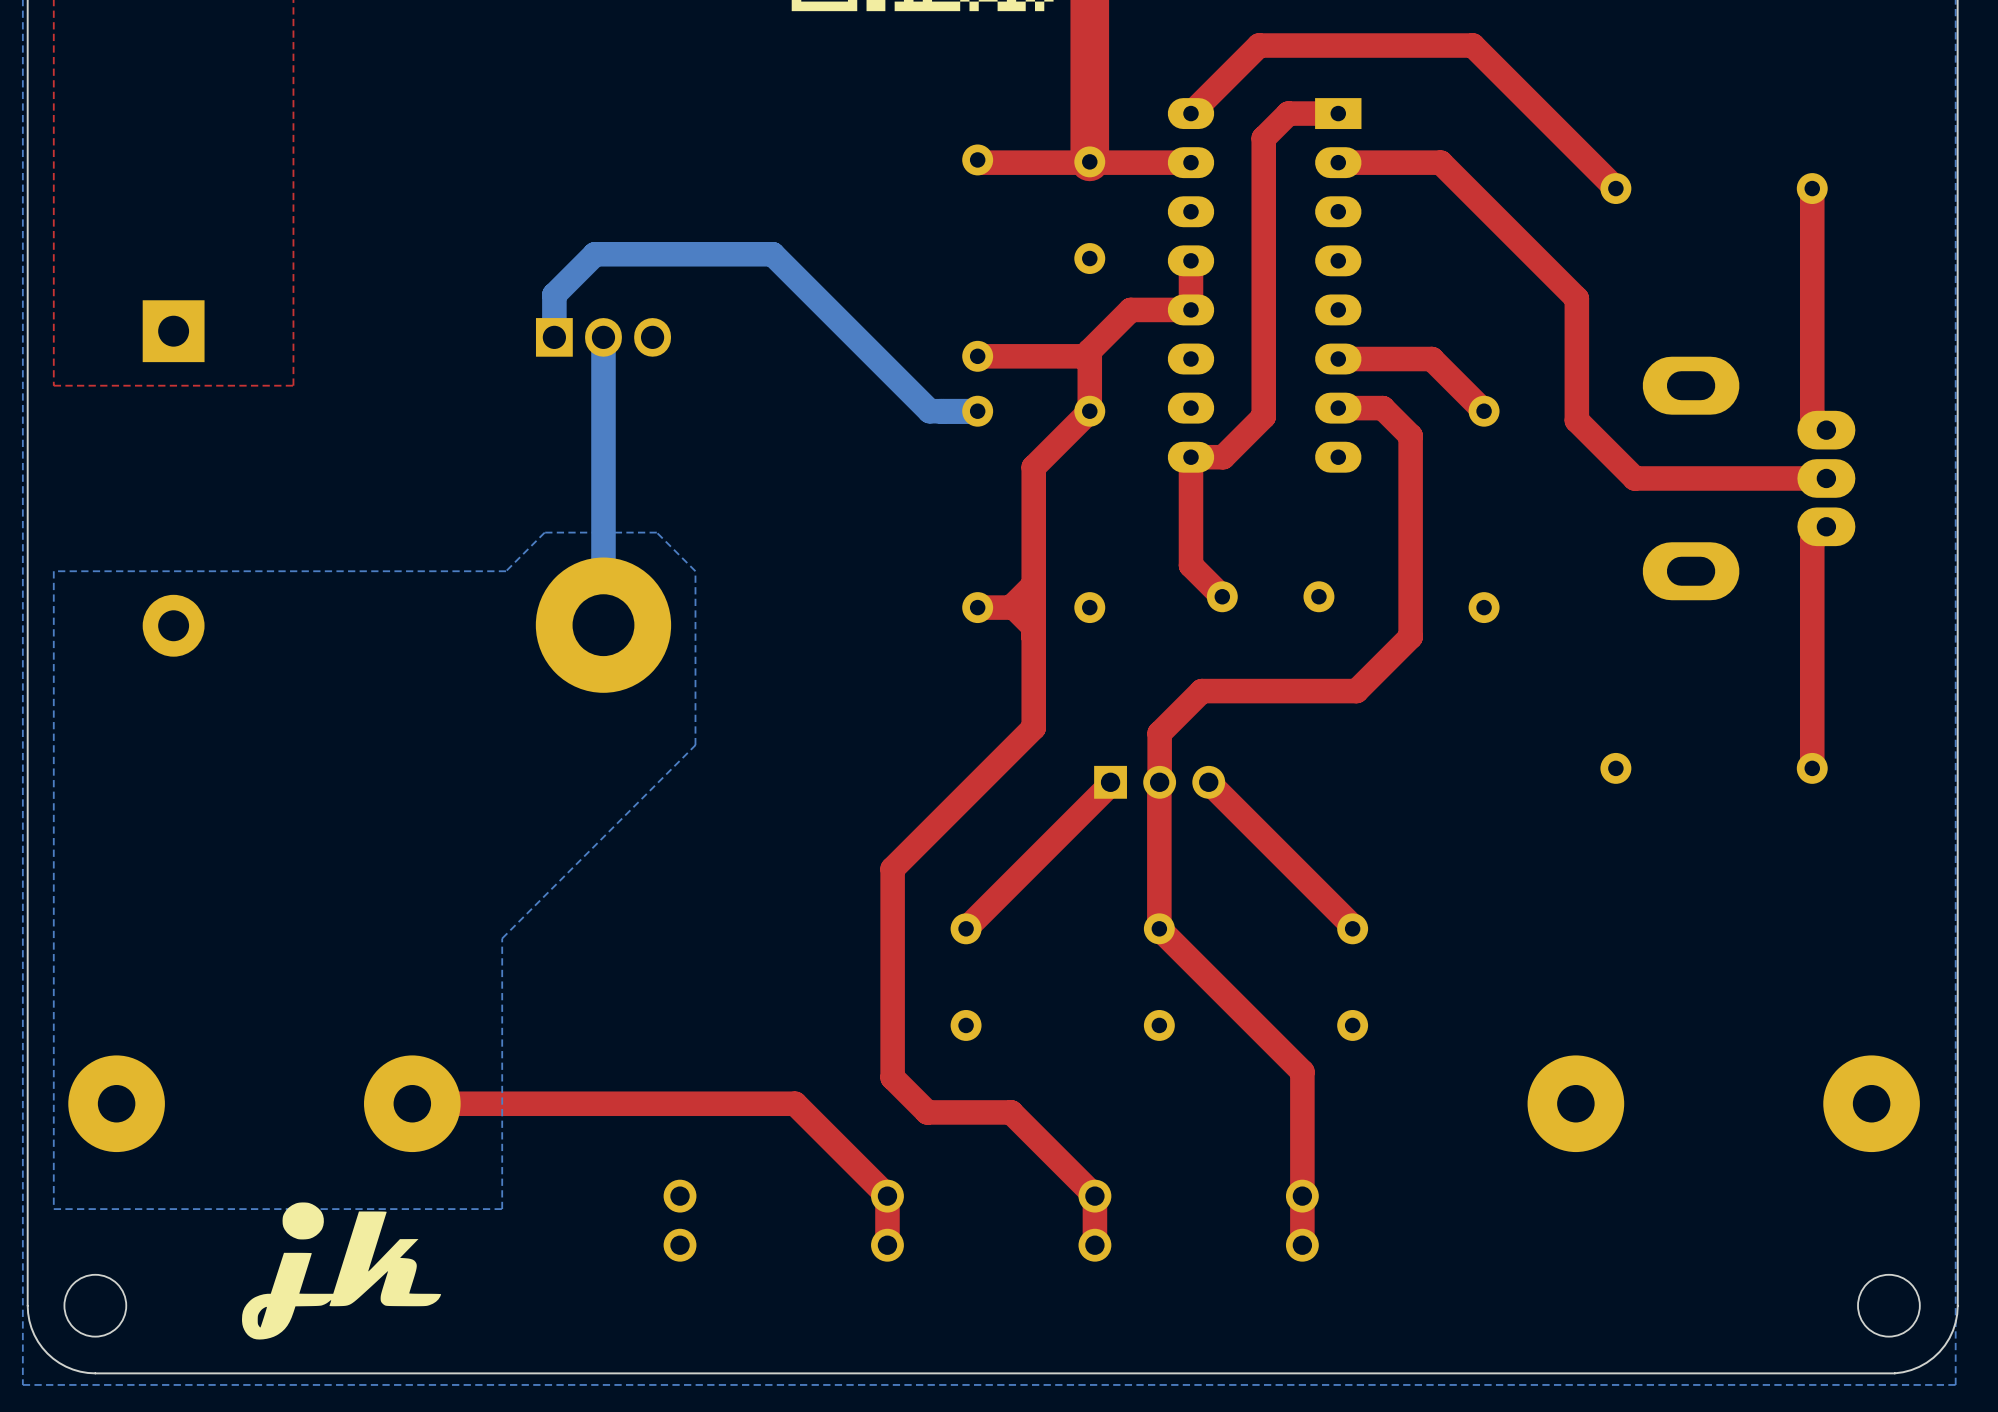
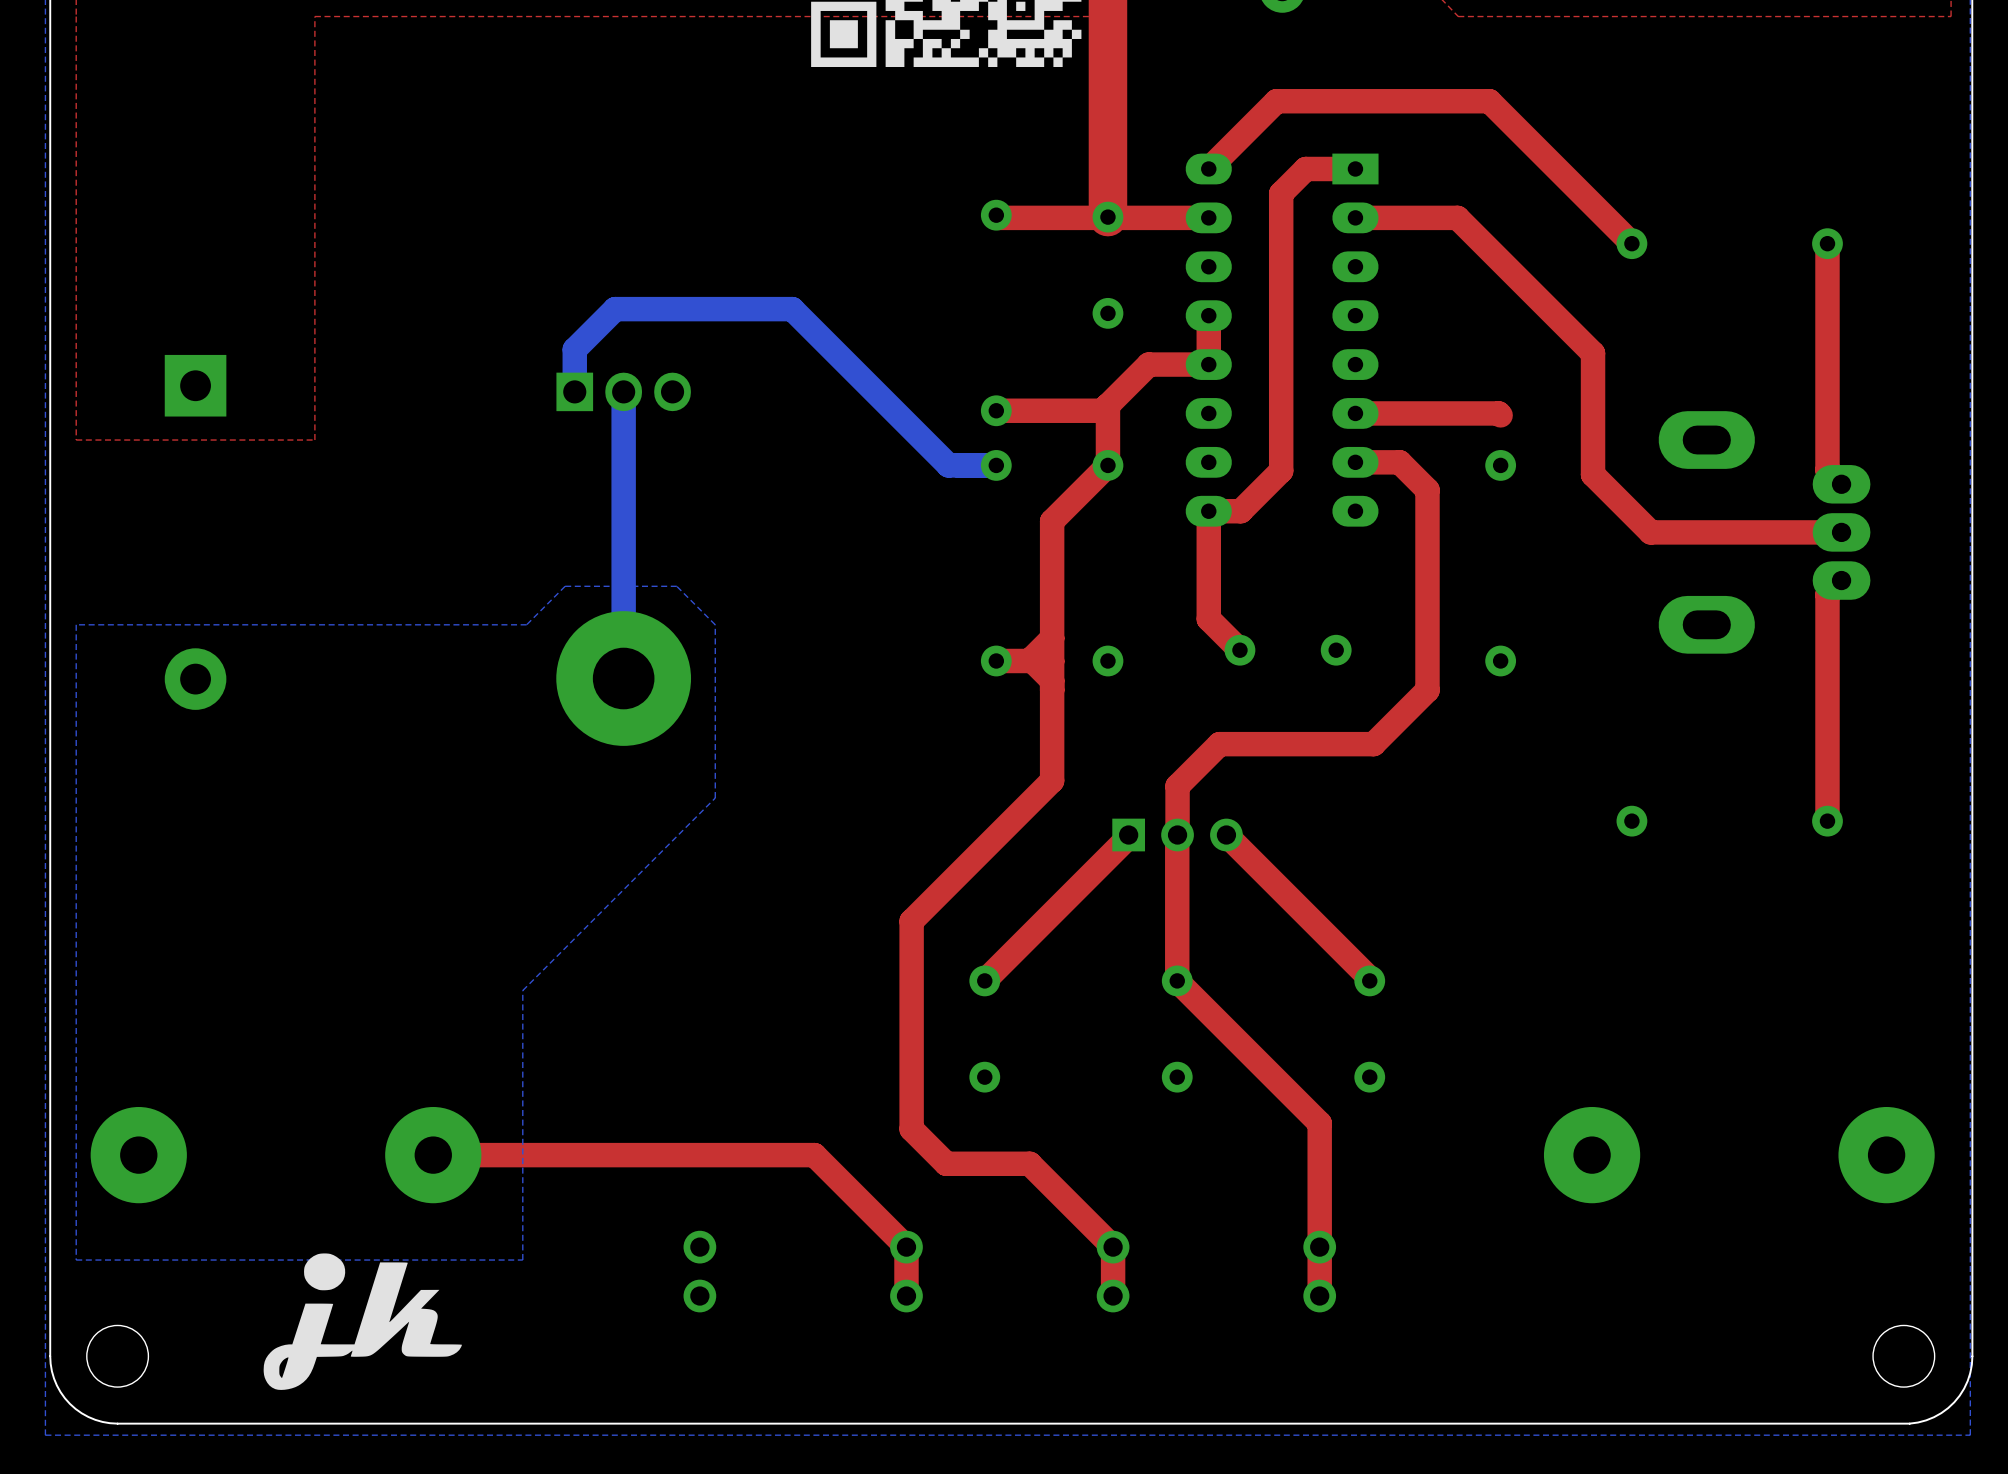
top track: (1431, 359) (1484, 411) -> (1448, 413) (1498, 413) (1500, 415)

